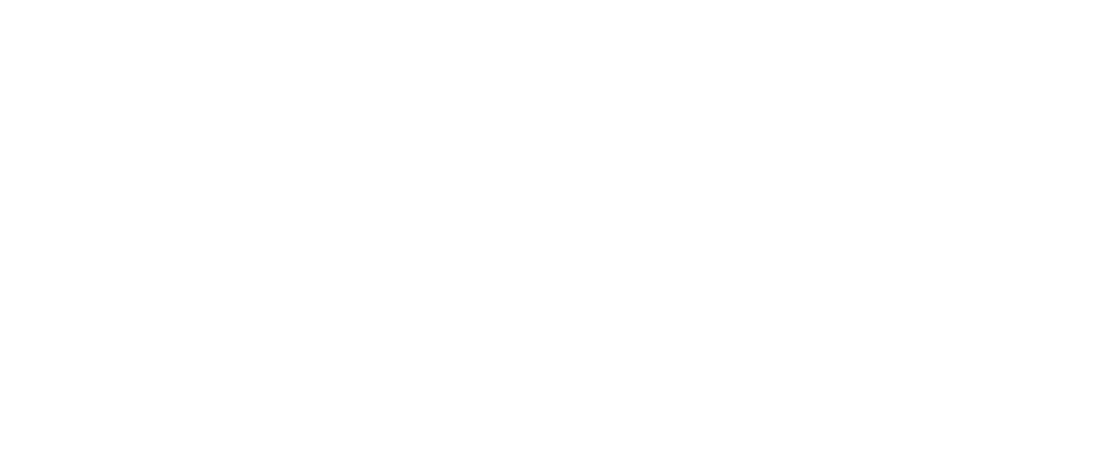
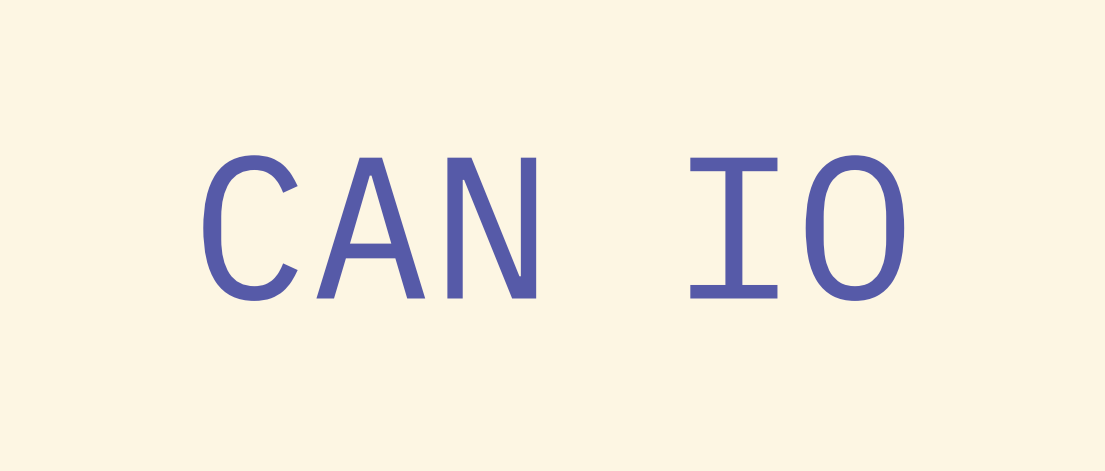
text: none -> CAN IO (553, 228)

